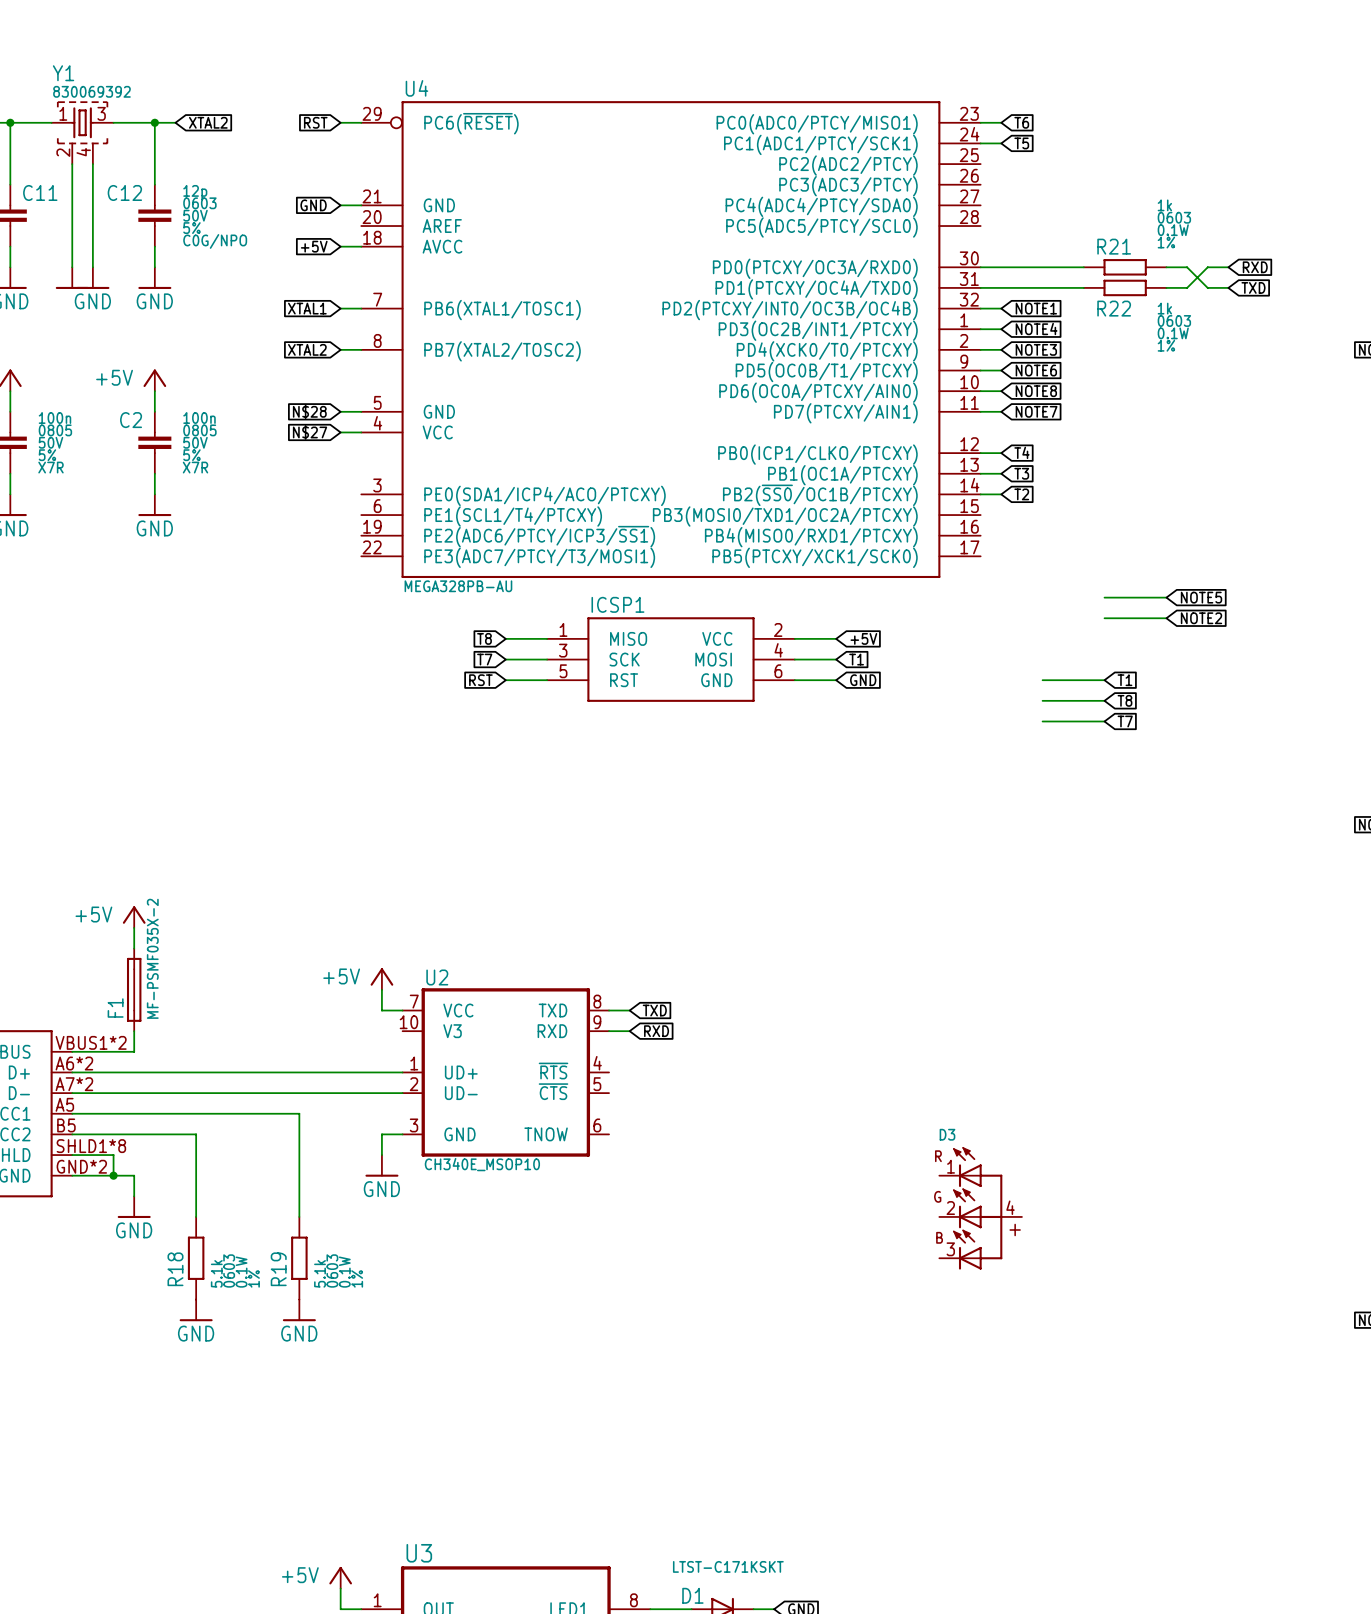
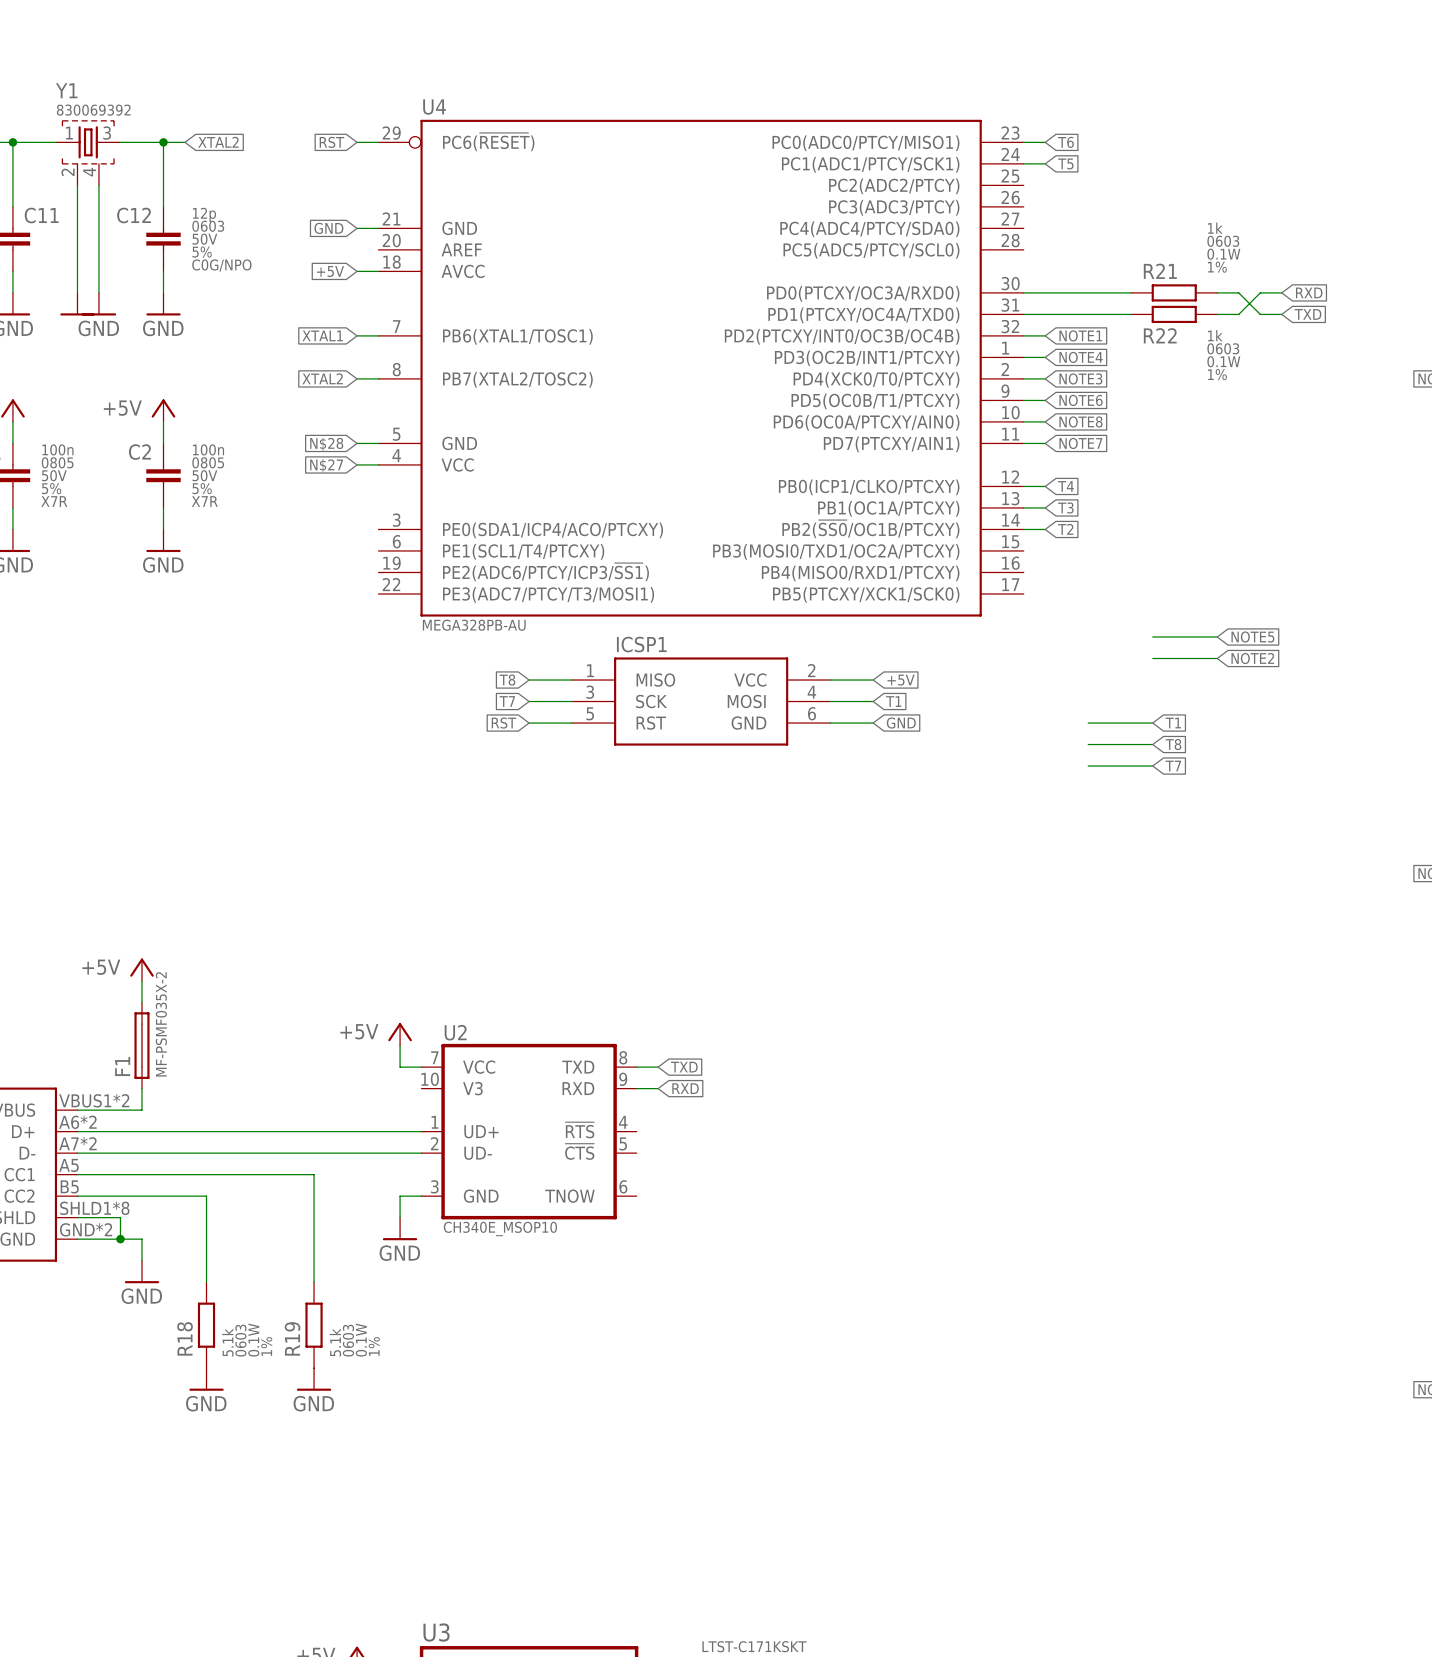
D3: (980, 1208) -> none

